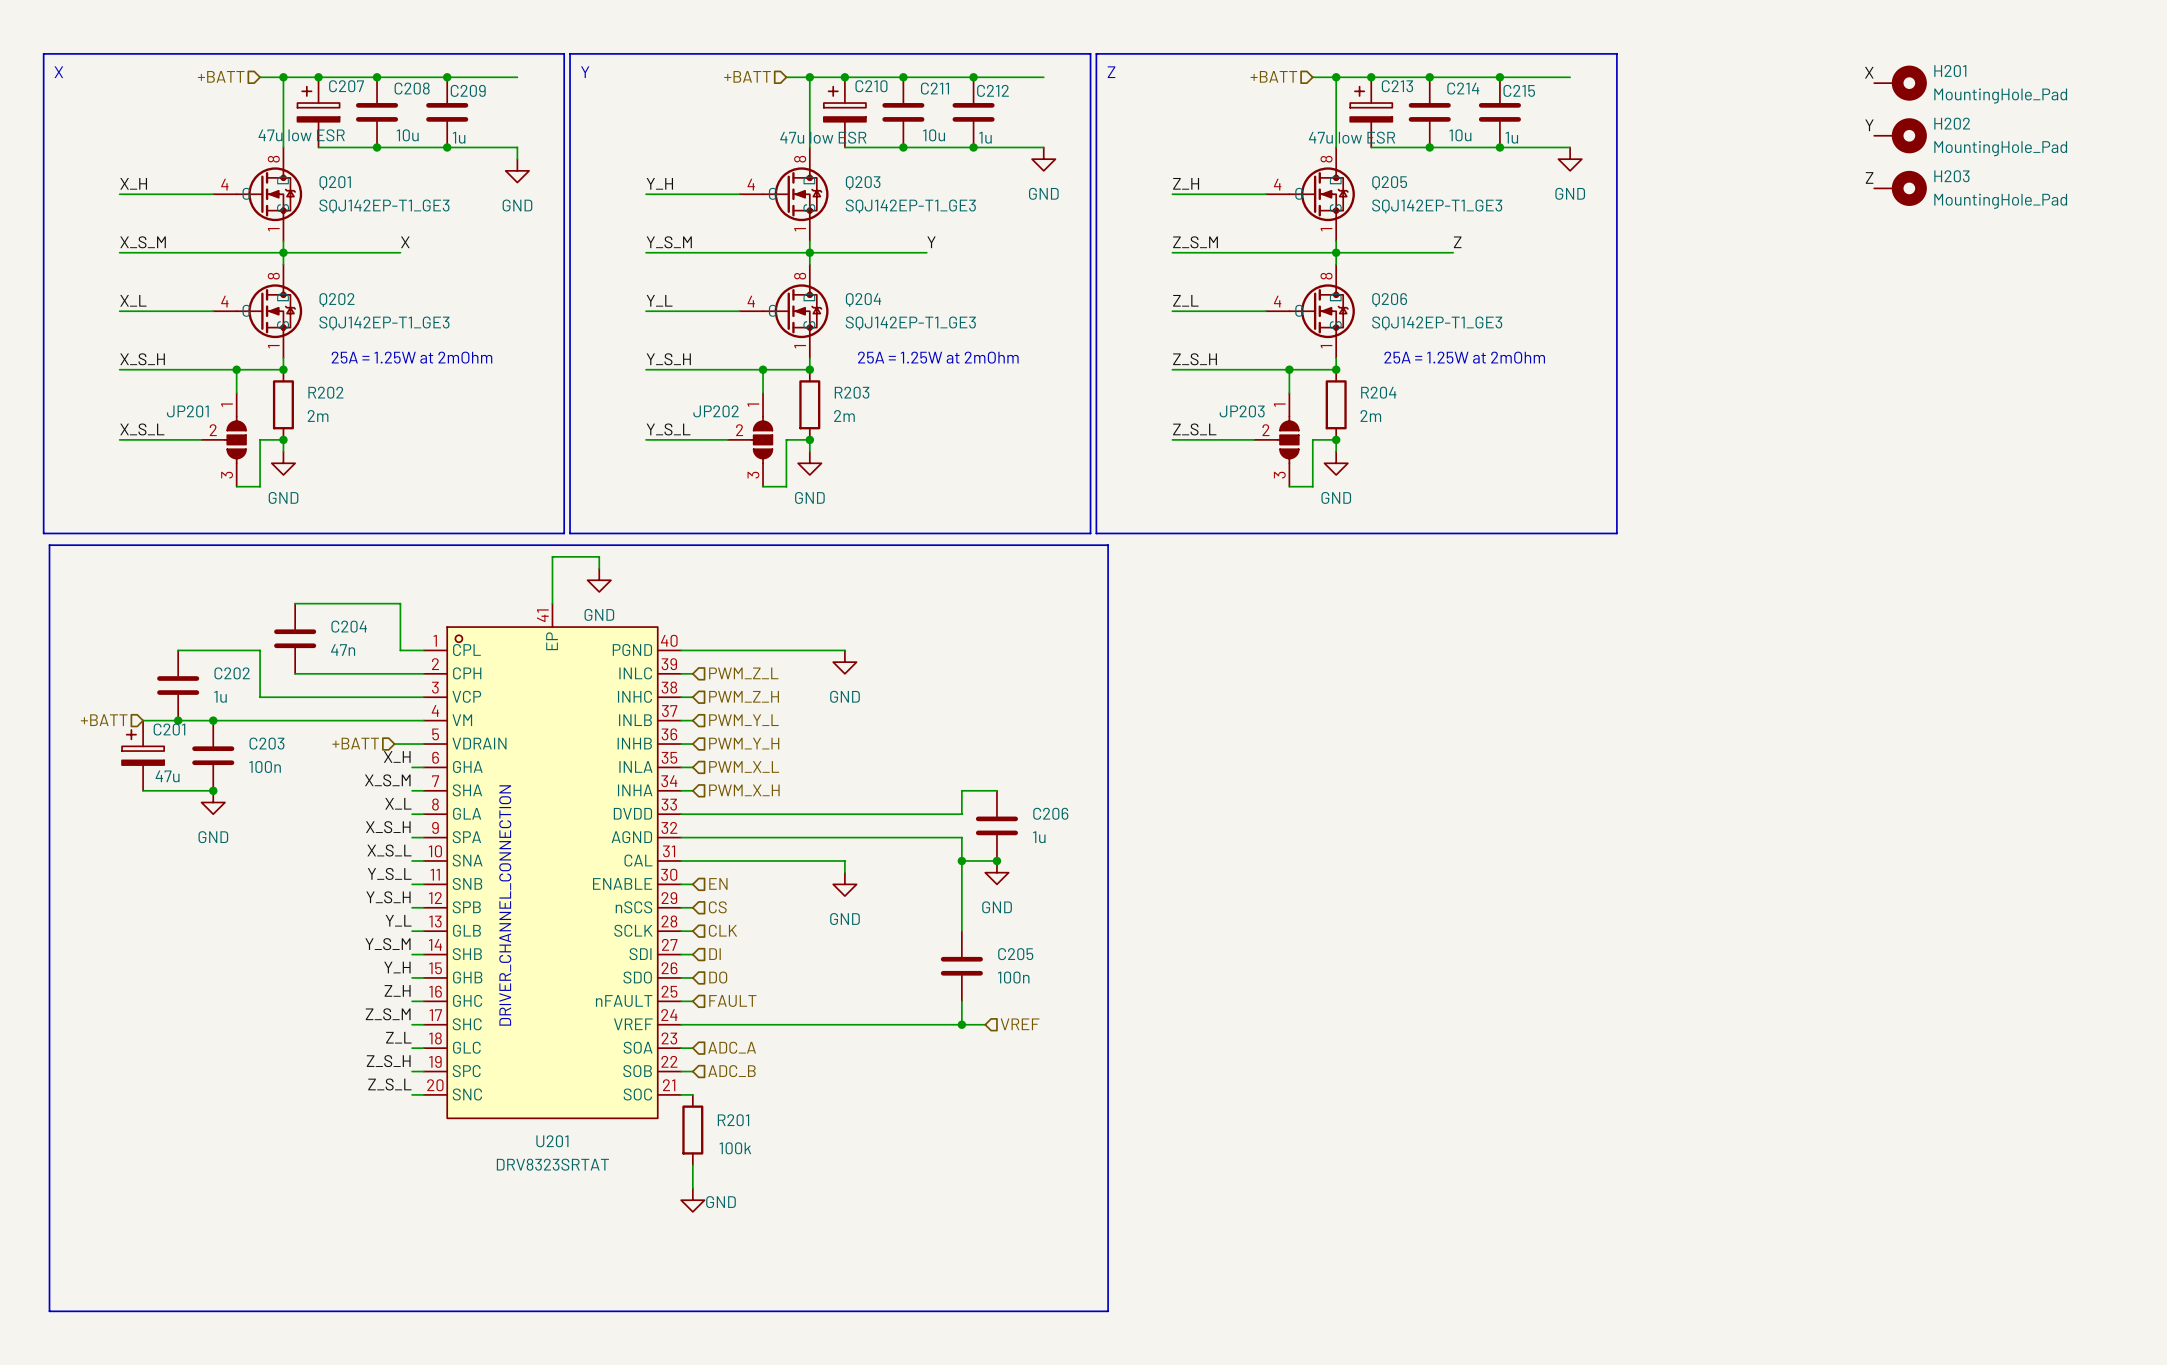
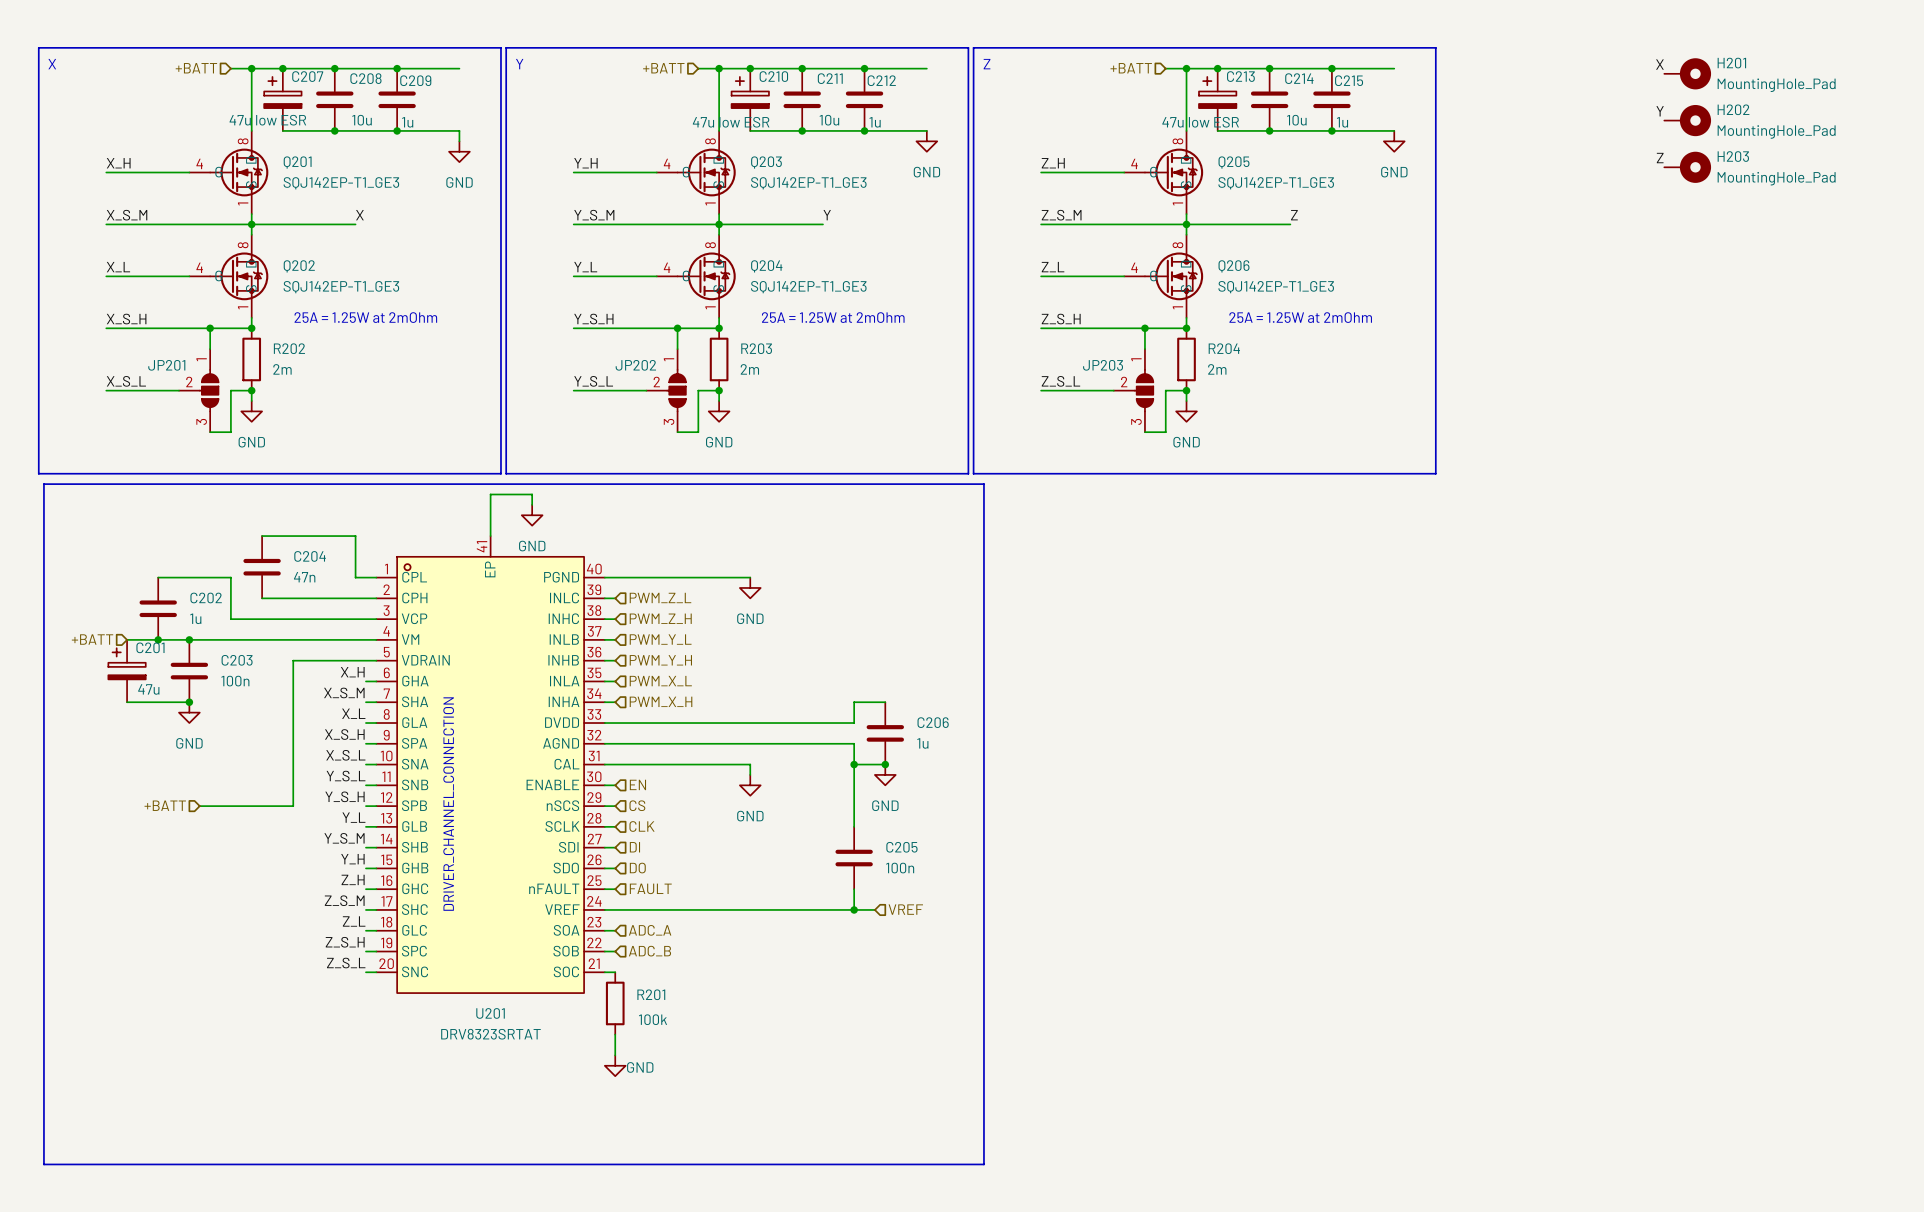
hierarchical label: +BATT (355, 743) -> none
wire: none -> (350, 660) (293, 660) (293, 806) (199, 806)
hierarchical label: none -> +BATT (165, 805)

